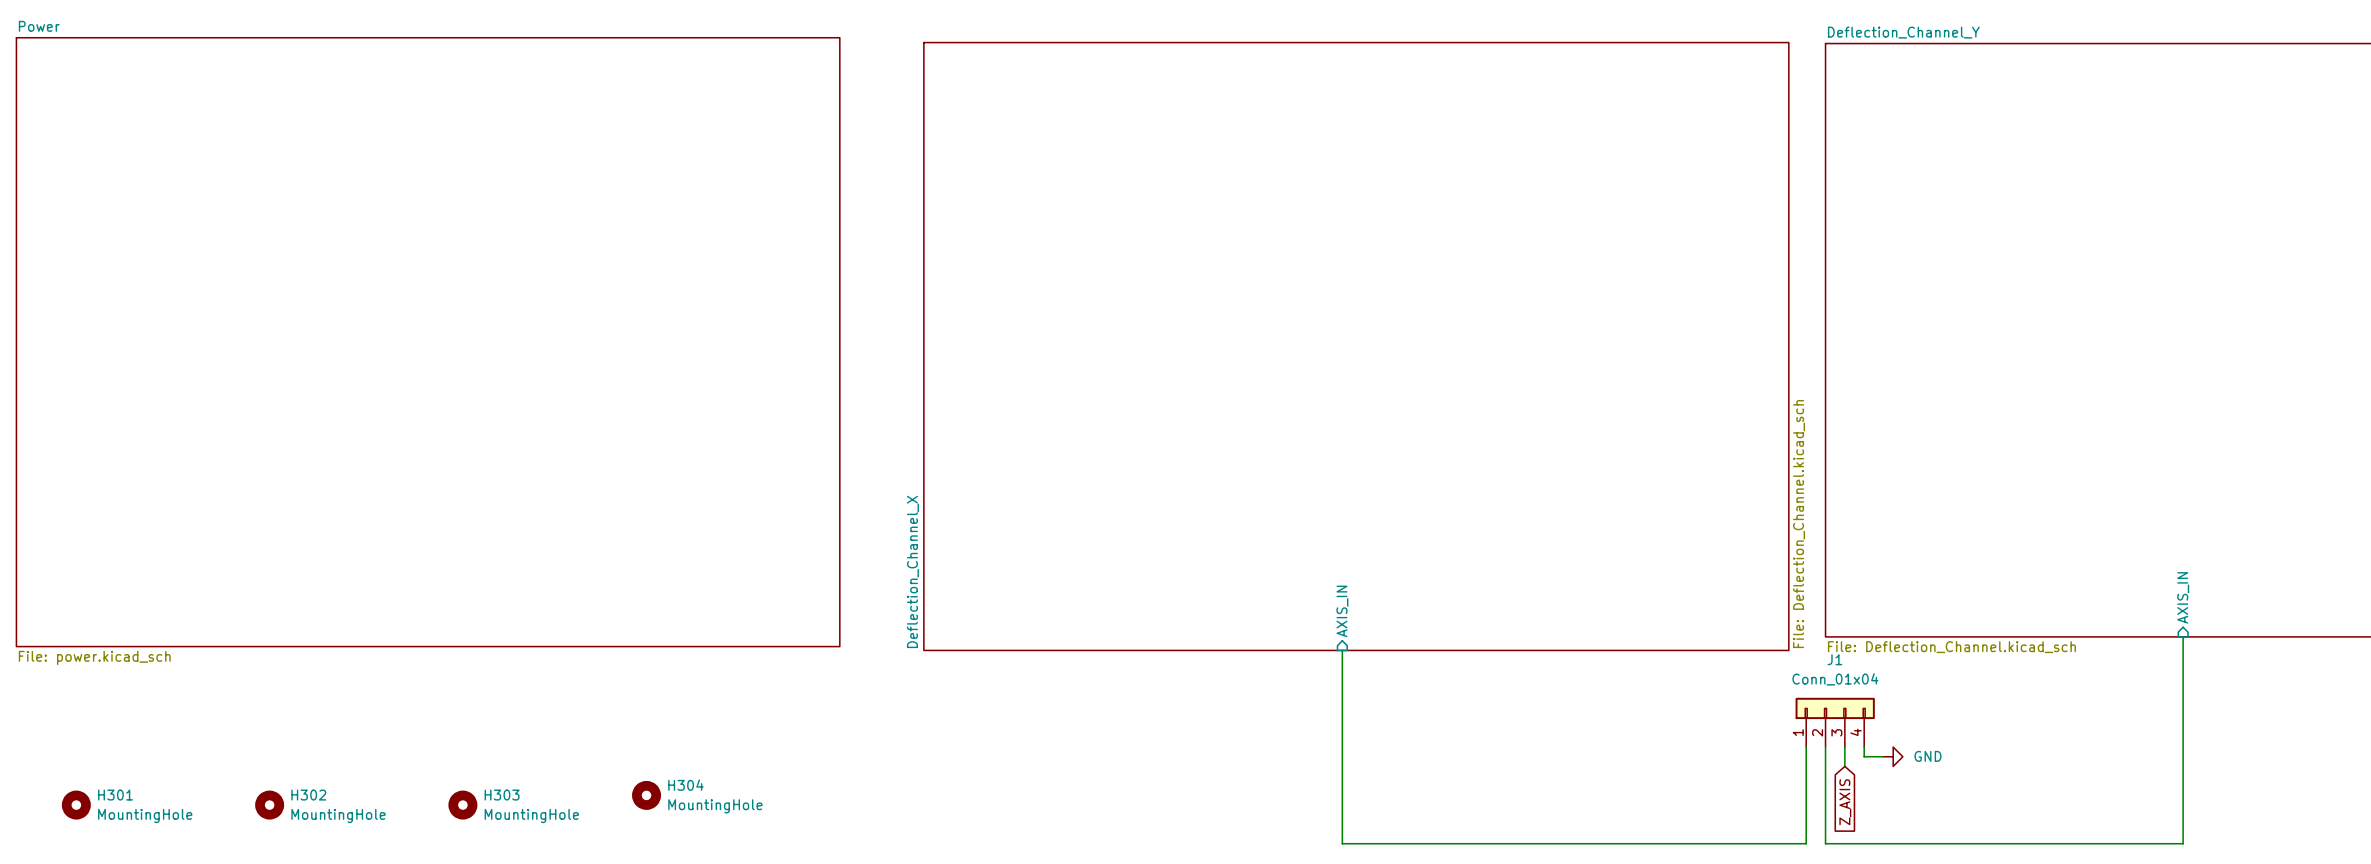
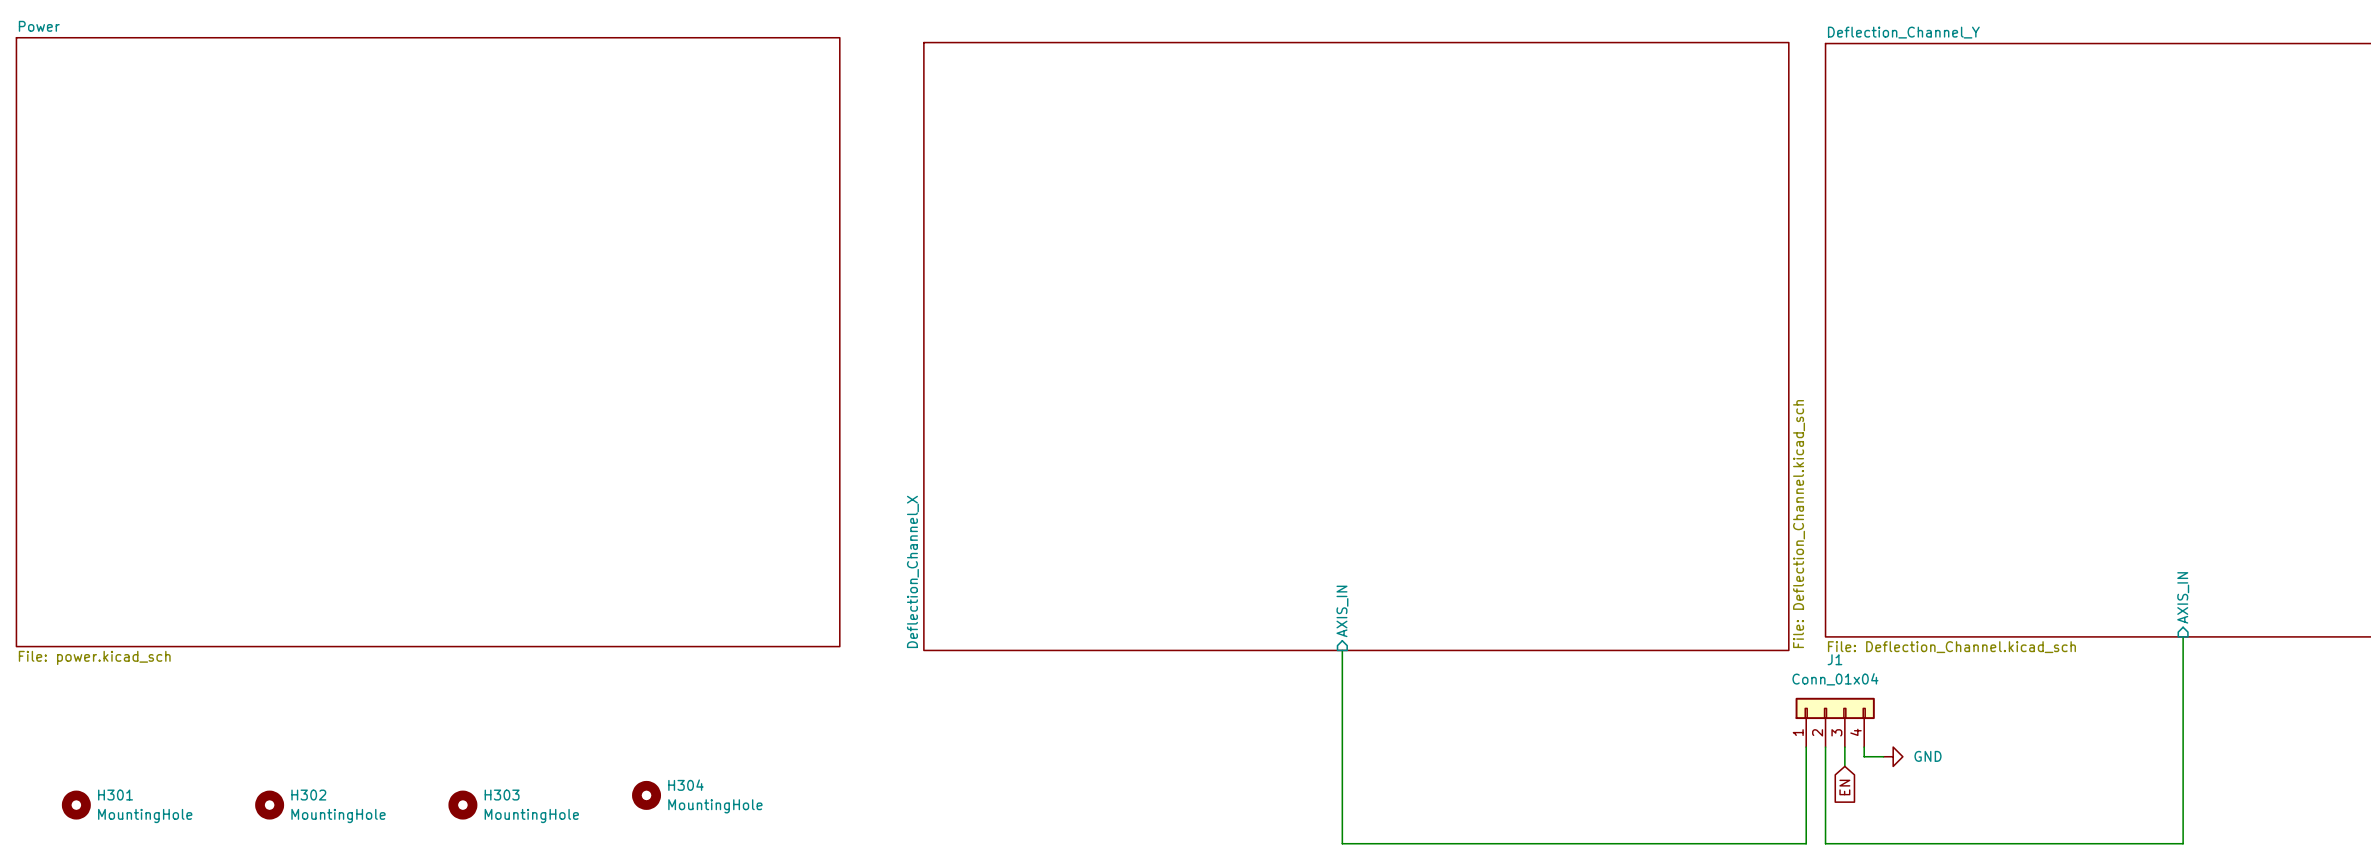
global label: Z_AXIS (1845, 802) -> EN (1844, 787)

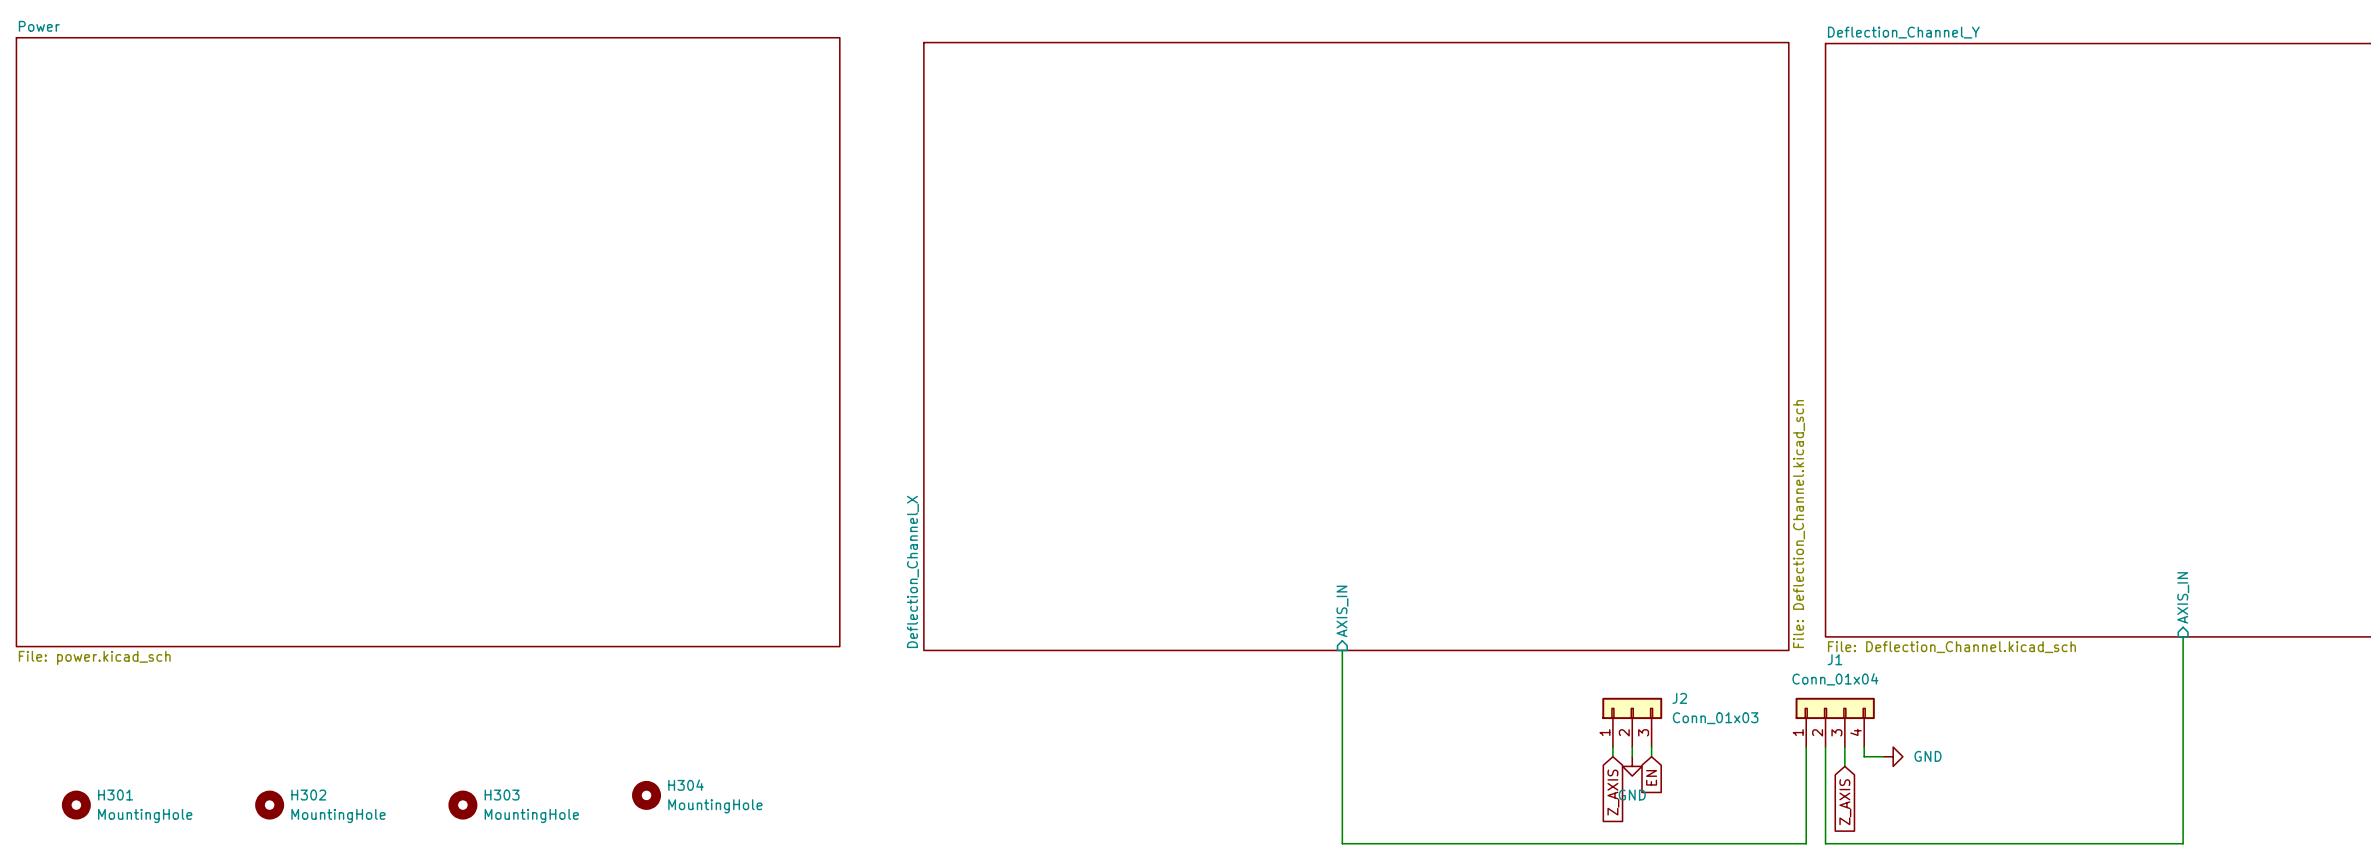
J2: none -> Conn_01x03 (1632, 722)
wire: none -> (1612, 747) (1612, 756)
wire: none -> (1632, 747) (1632, 756)
wire: none -> (1651, 747) (1651, 756)
power symbol: none -> GND (1632, 766)
global label: none -> EN (1651, 777)
global label: EN (1844, 787) -> Z_AXIS (1845, 802)
global label: none -> Z_AXIS (1613, 792)

